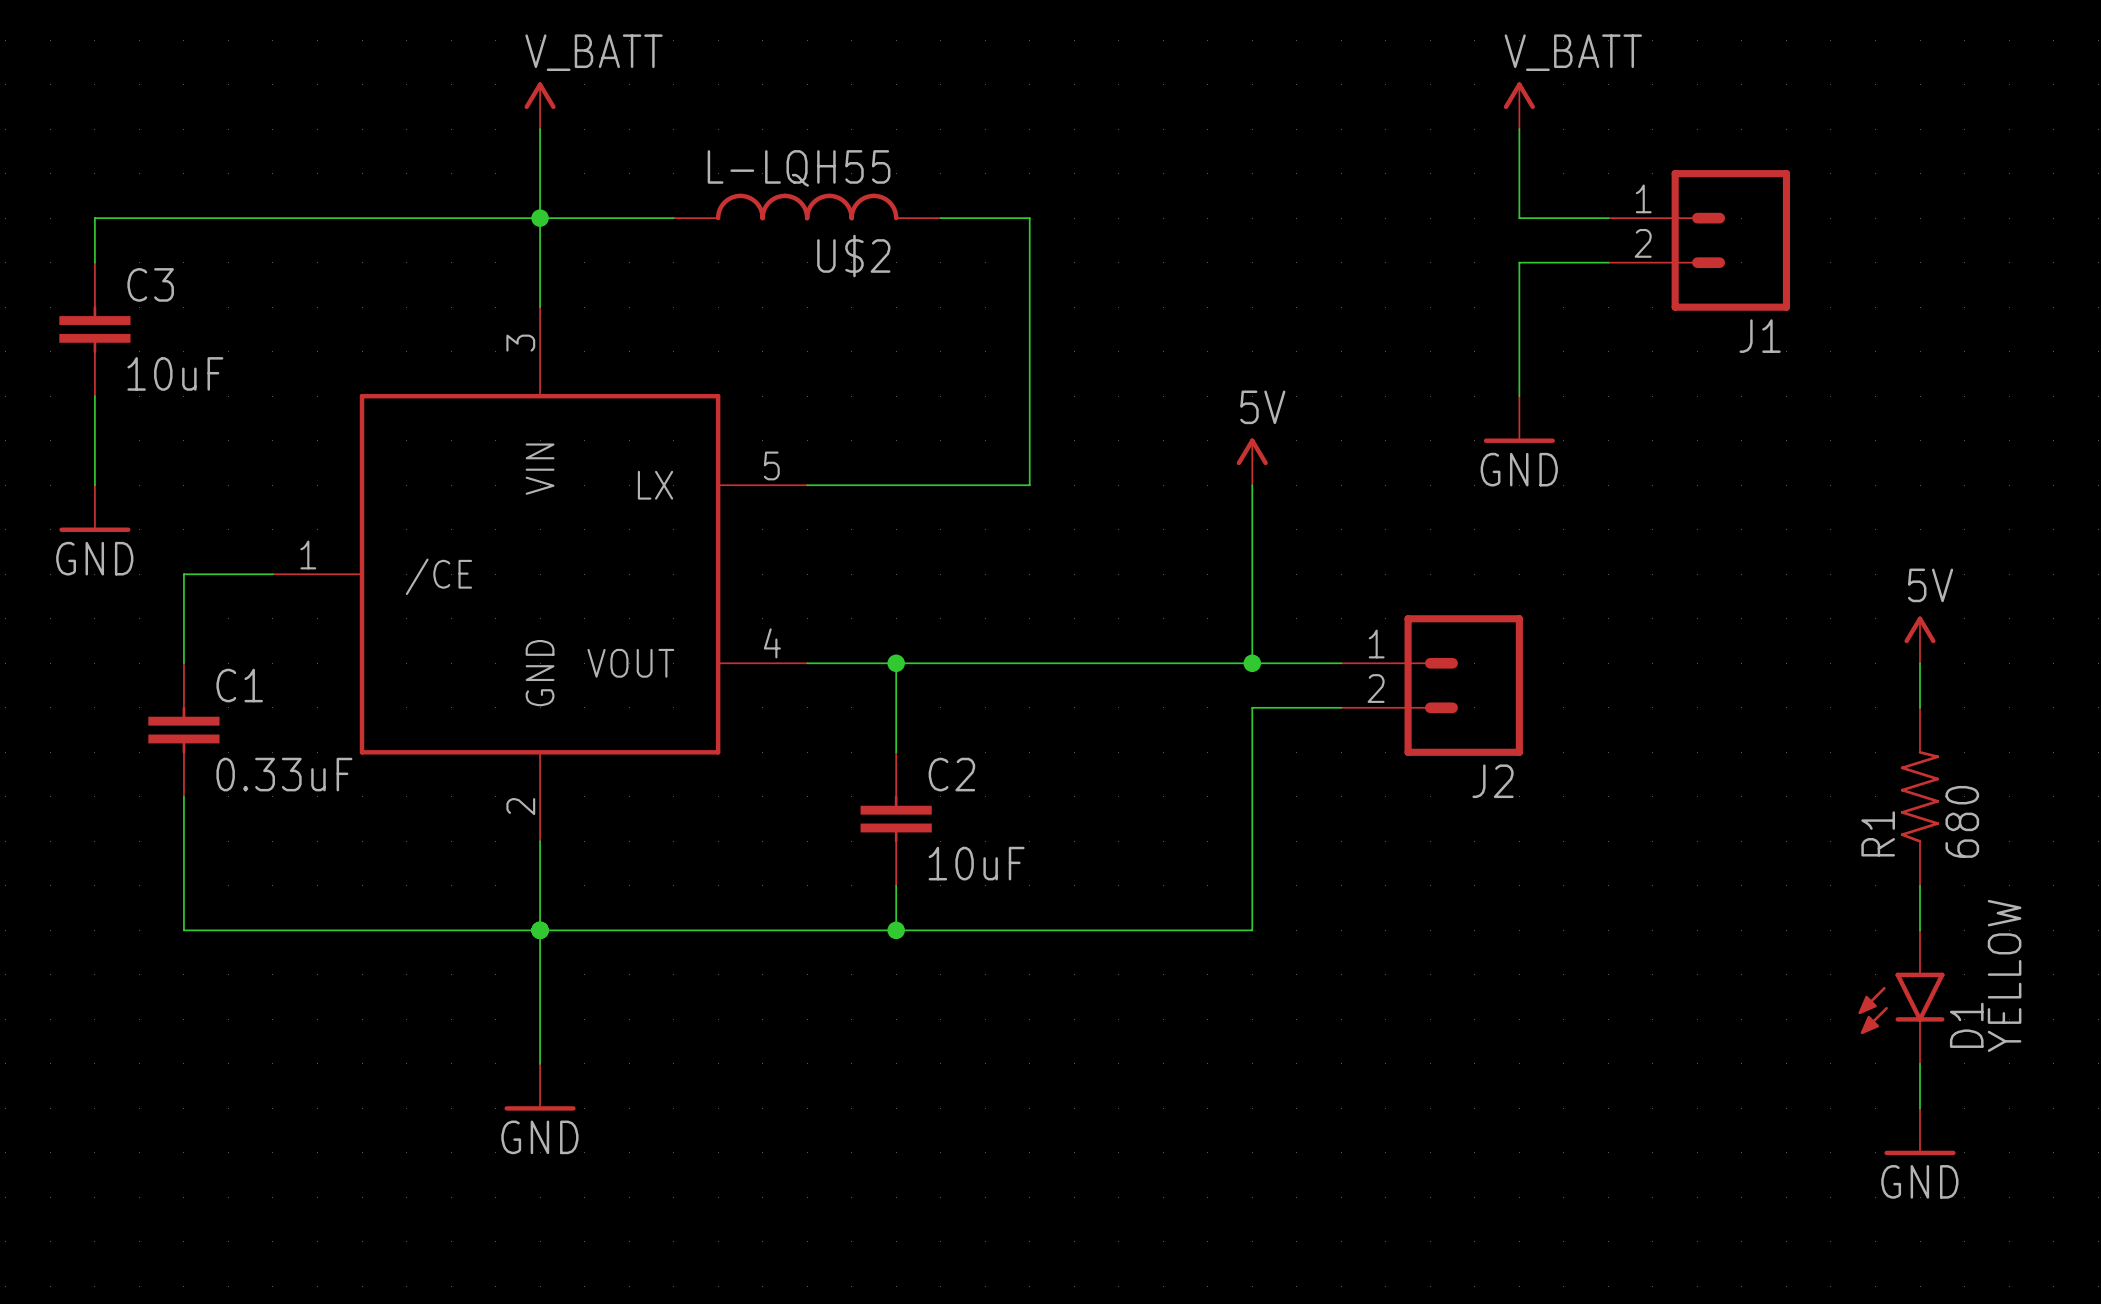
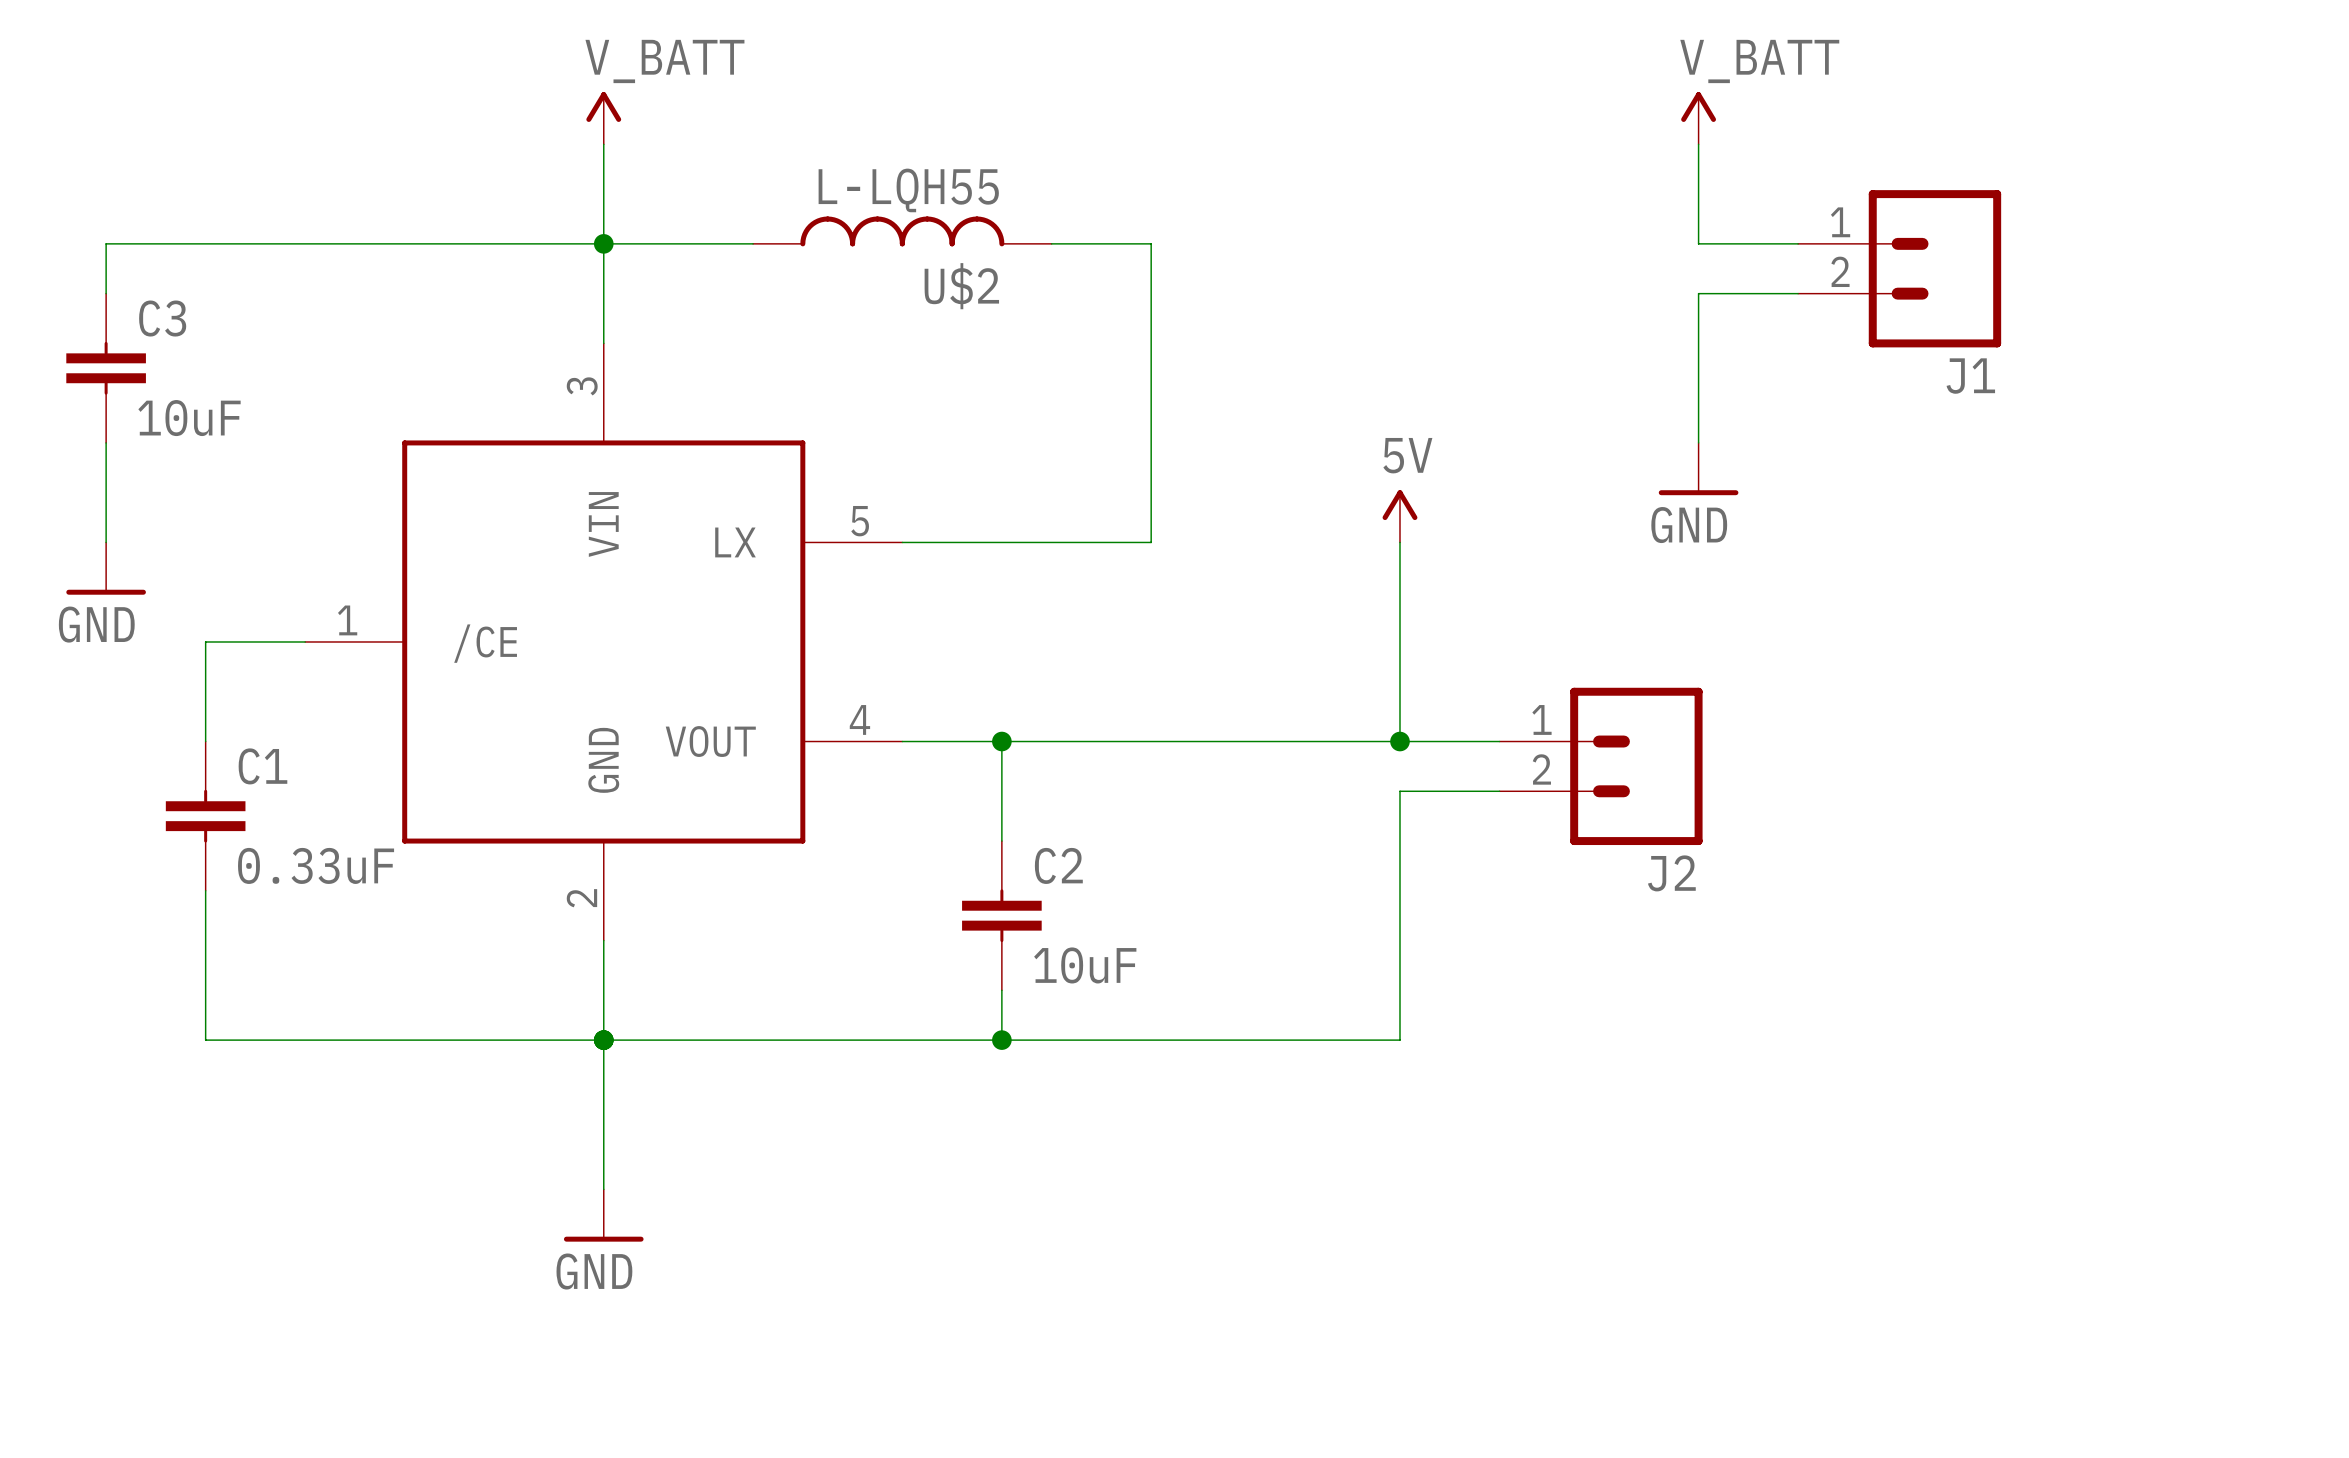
power symbol: 5V (1920, 639) -> none
wire: (1920, 663) (1920, 707) -> none
R1: 680 (1920, 796) -> none
wire: (1920, 885) (1920, 930) -> none
D1: YELLOW (1901, 997) -> none
wire: (1920, 1063) (1920, 1108) -> none
power symbol: GND (1920, 1131) -> none

